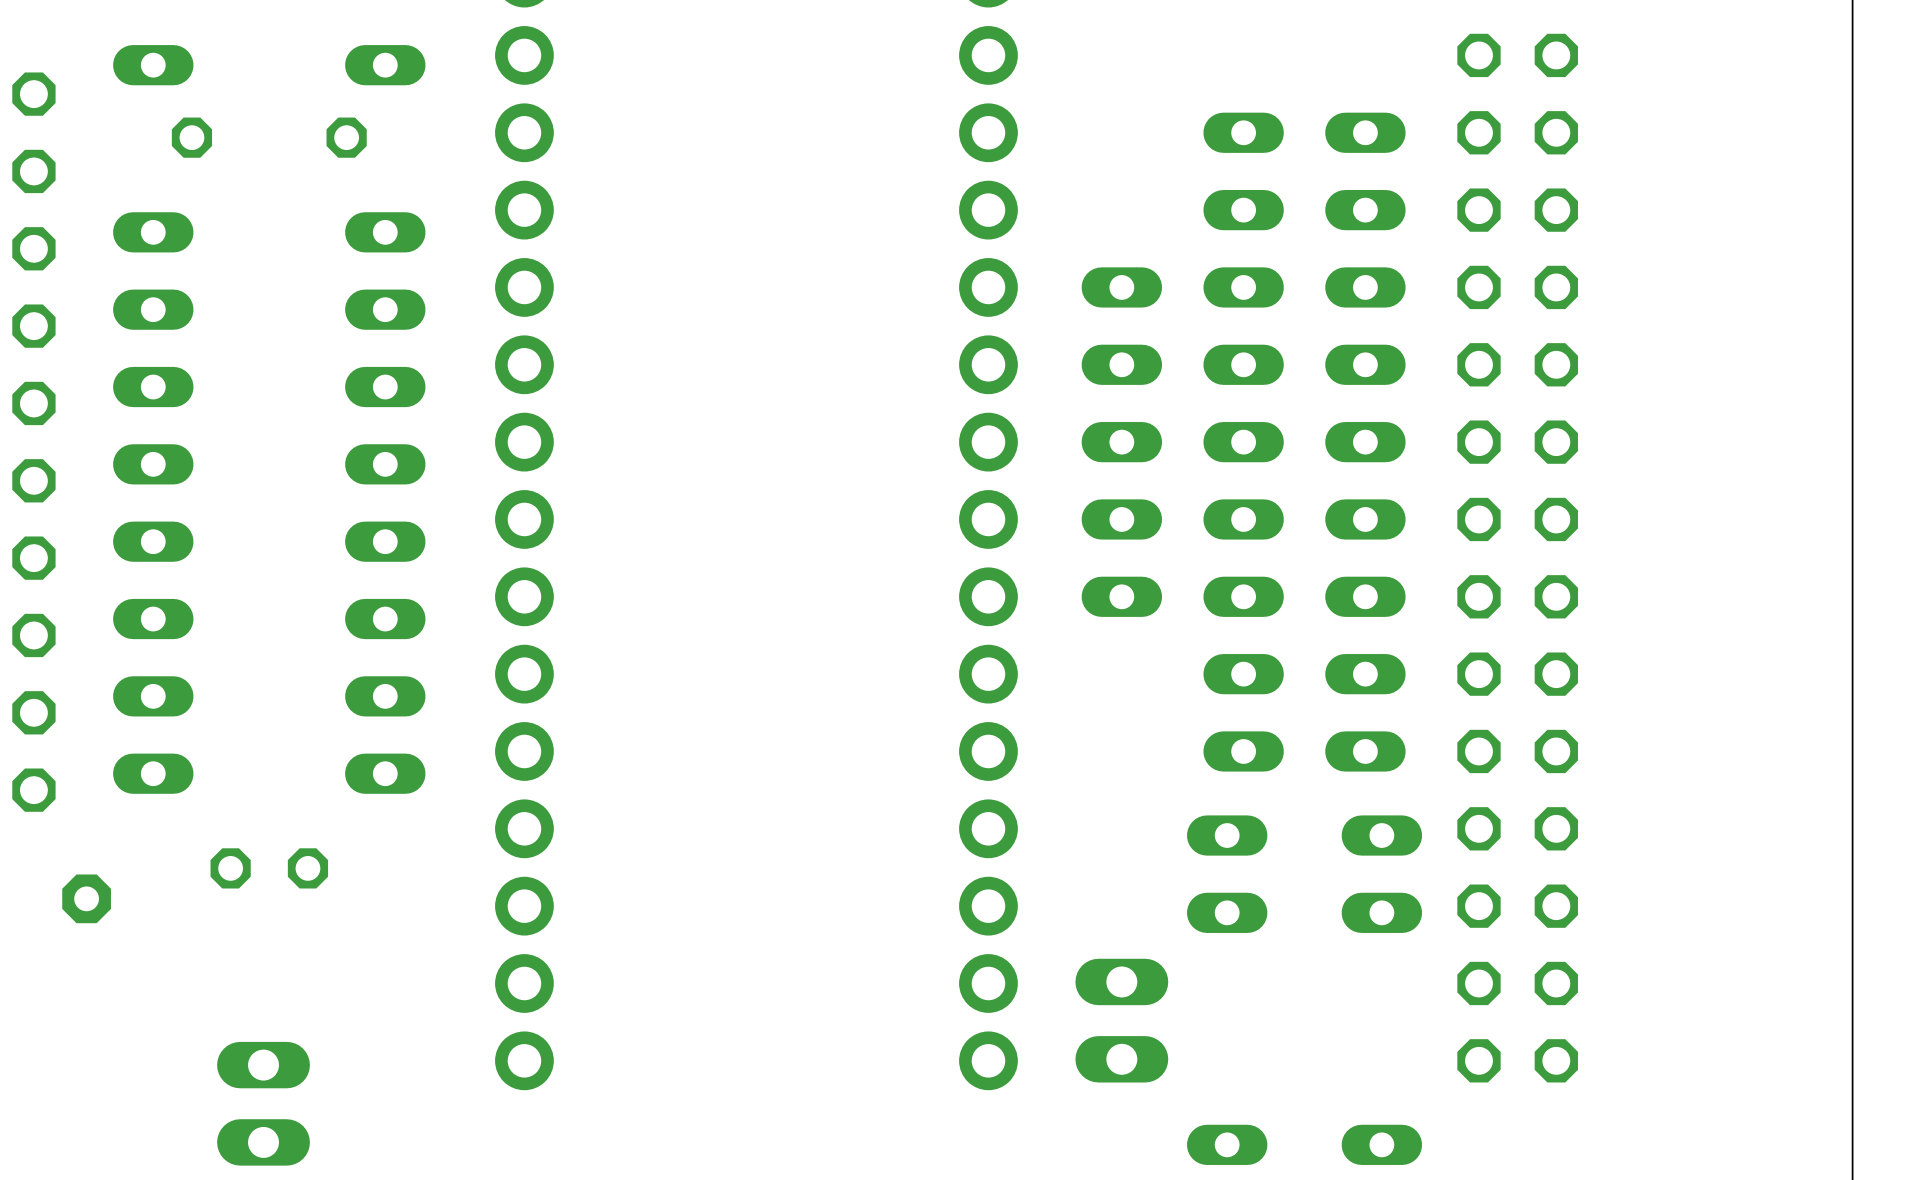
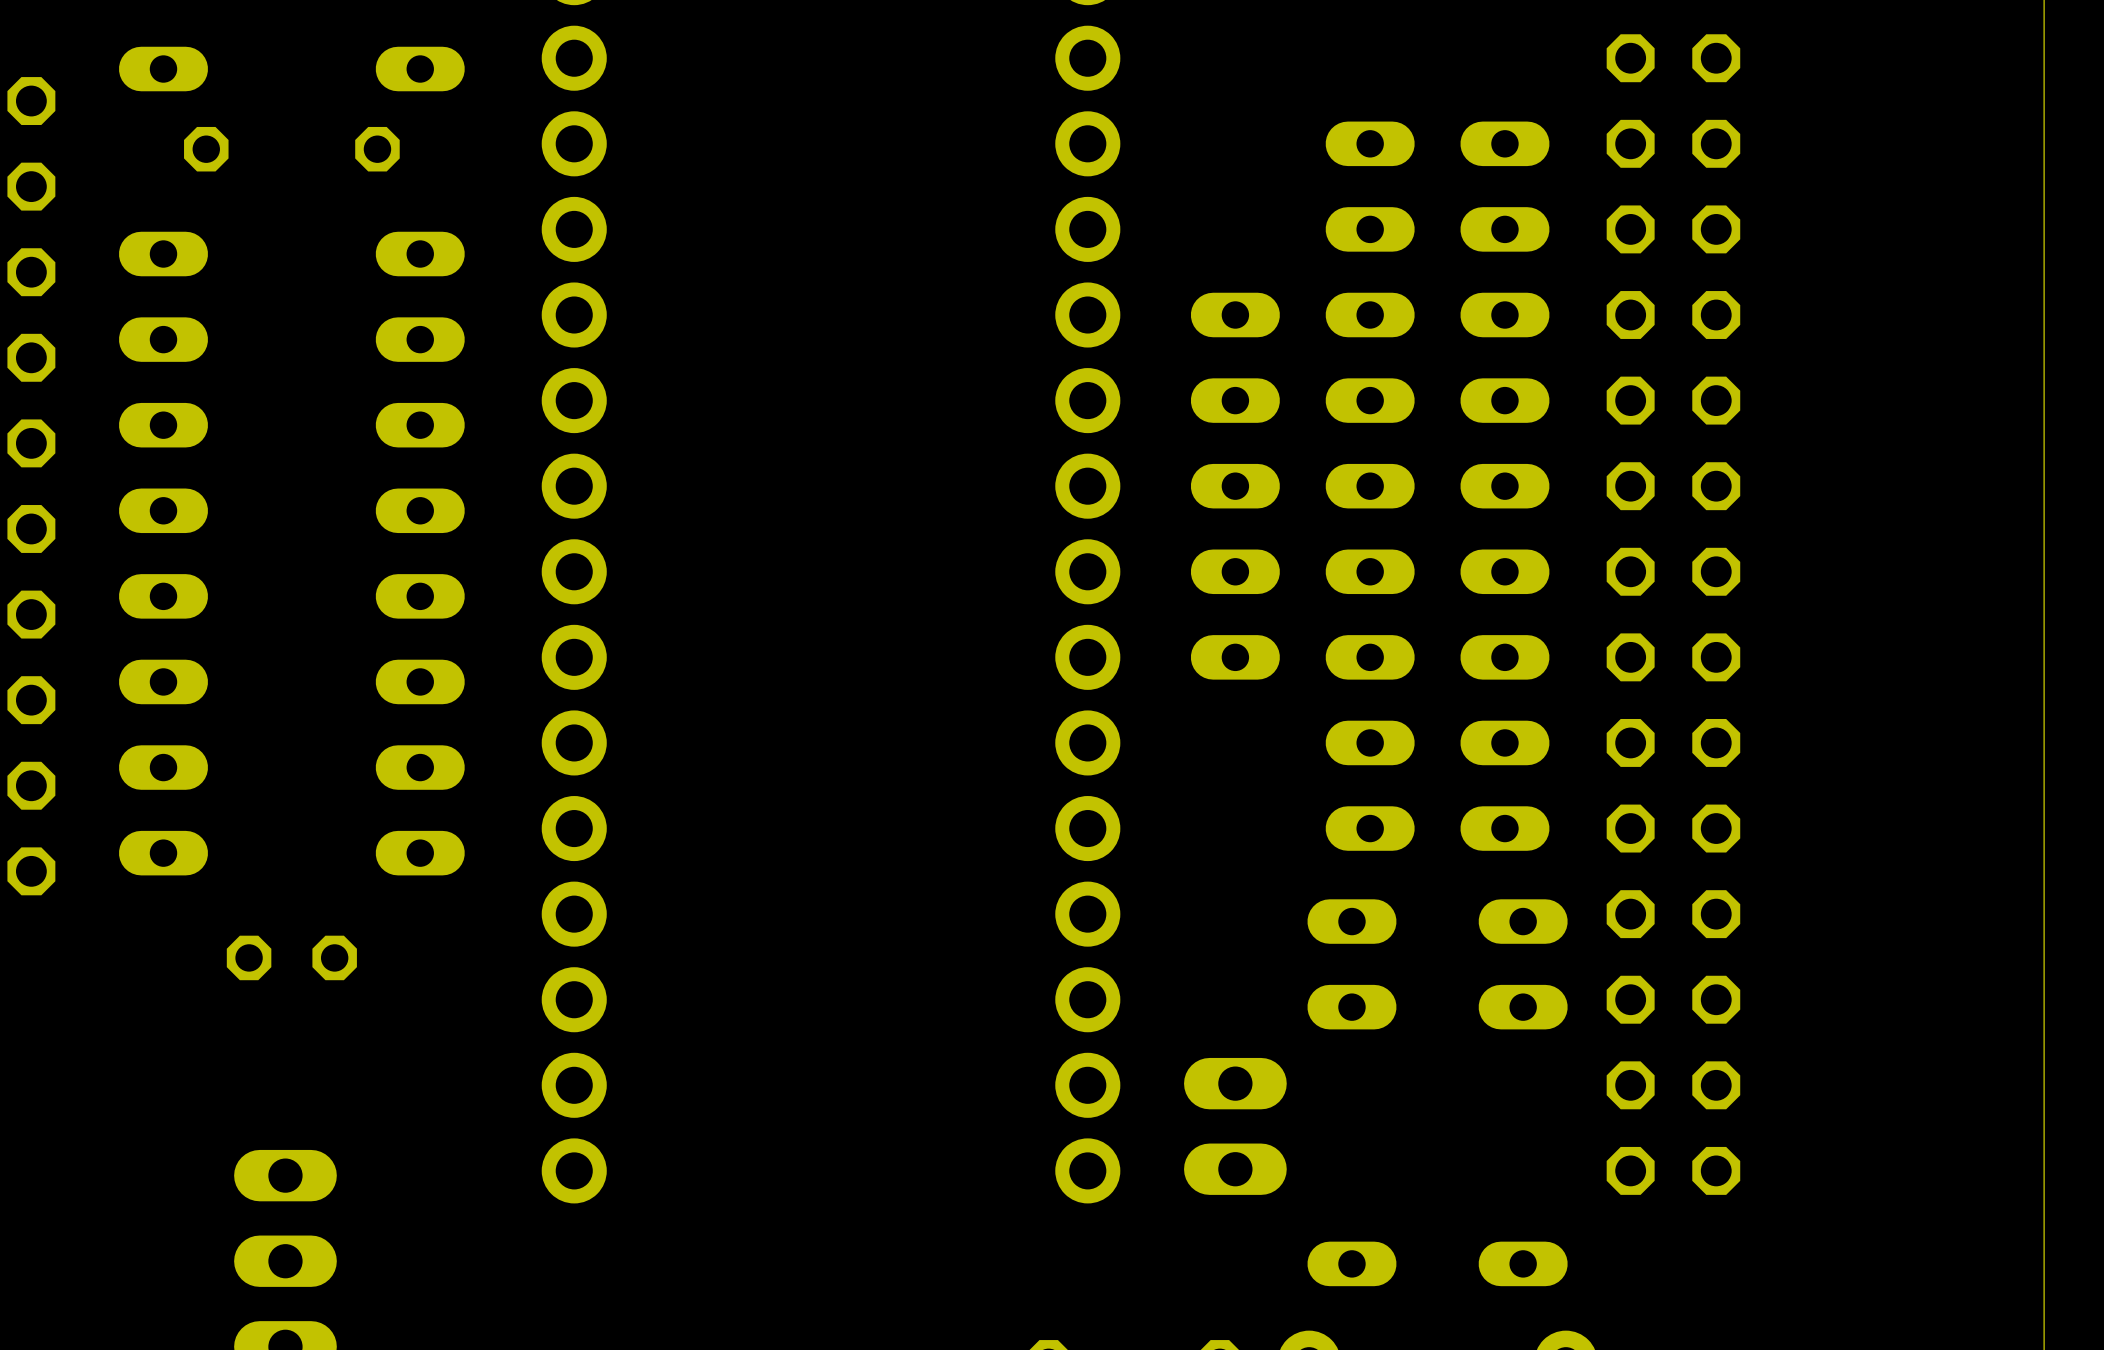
part: (86, 898) -> none

